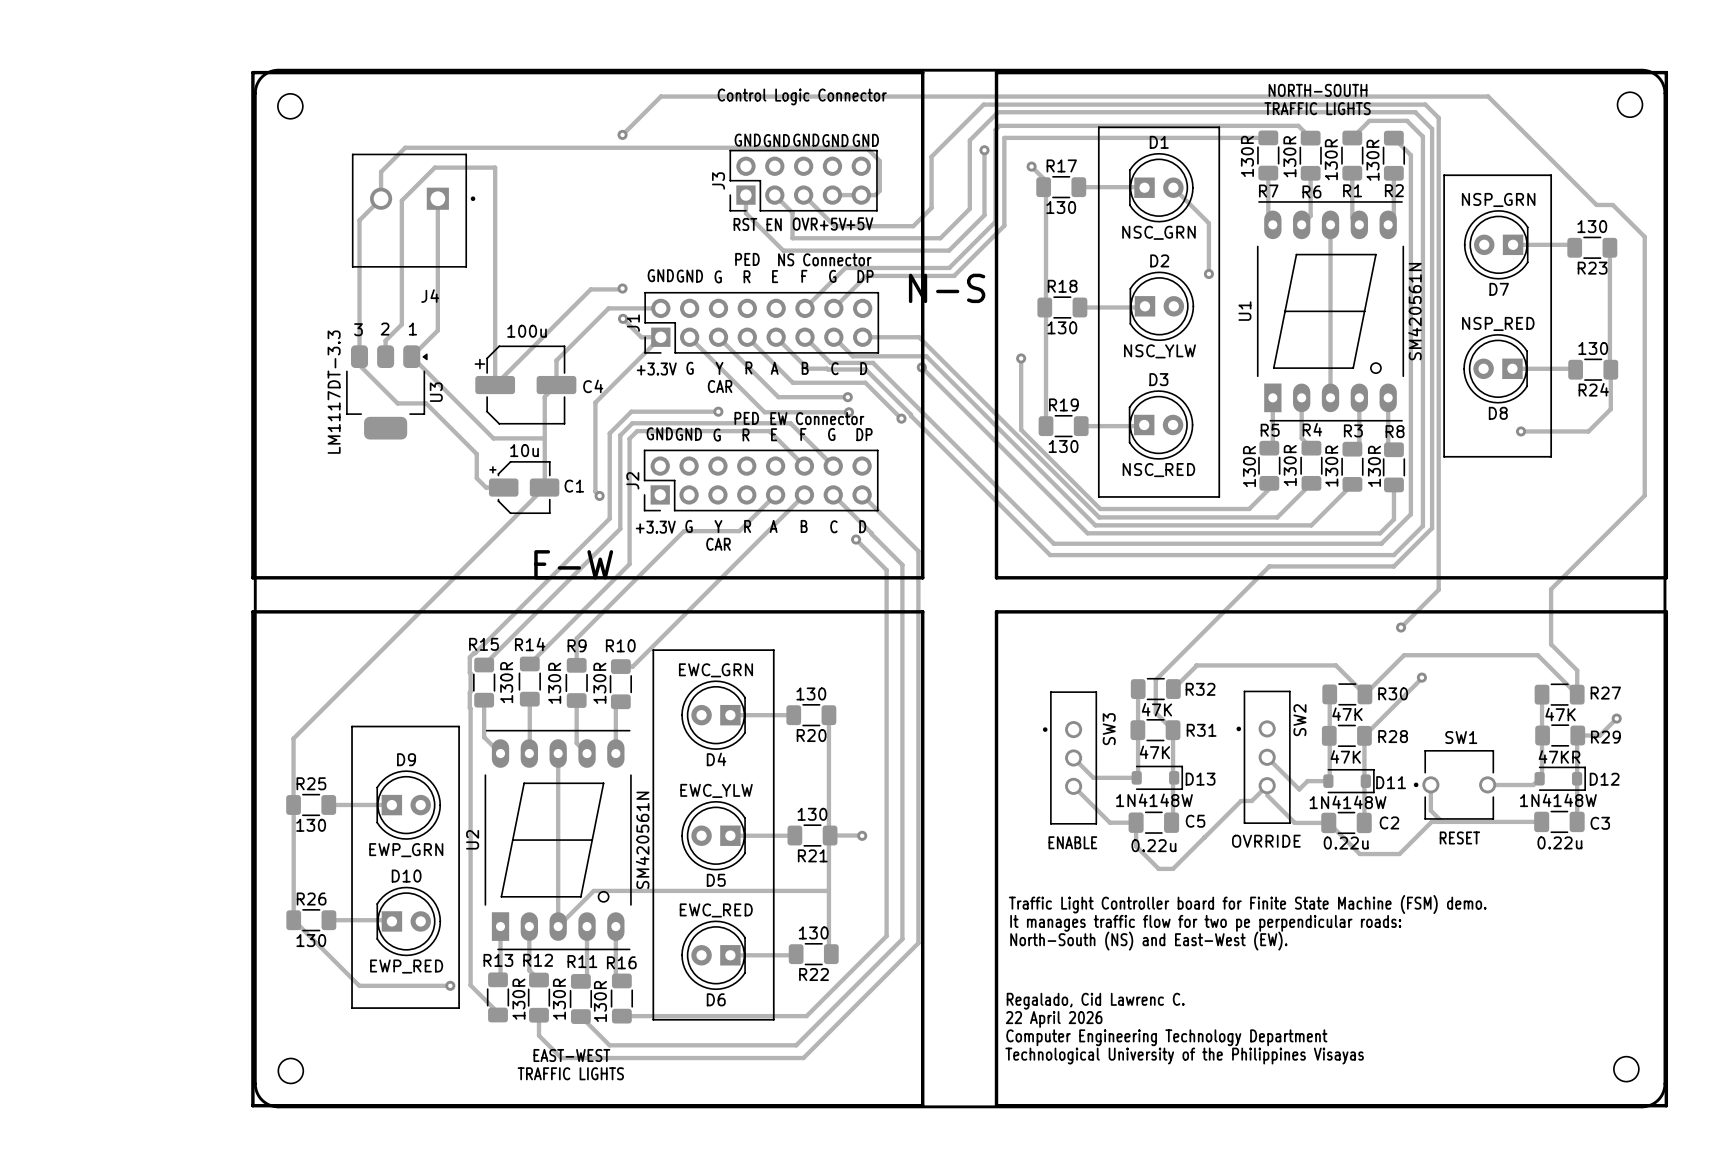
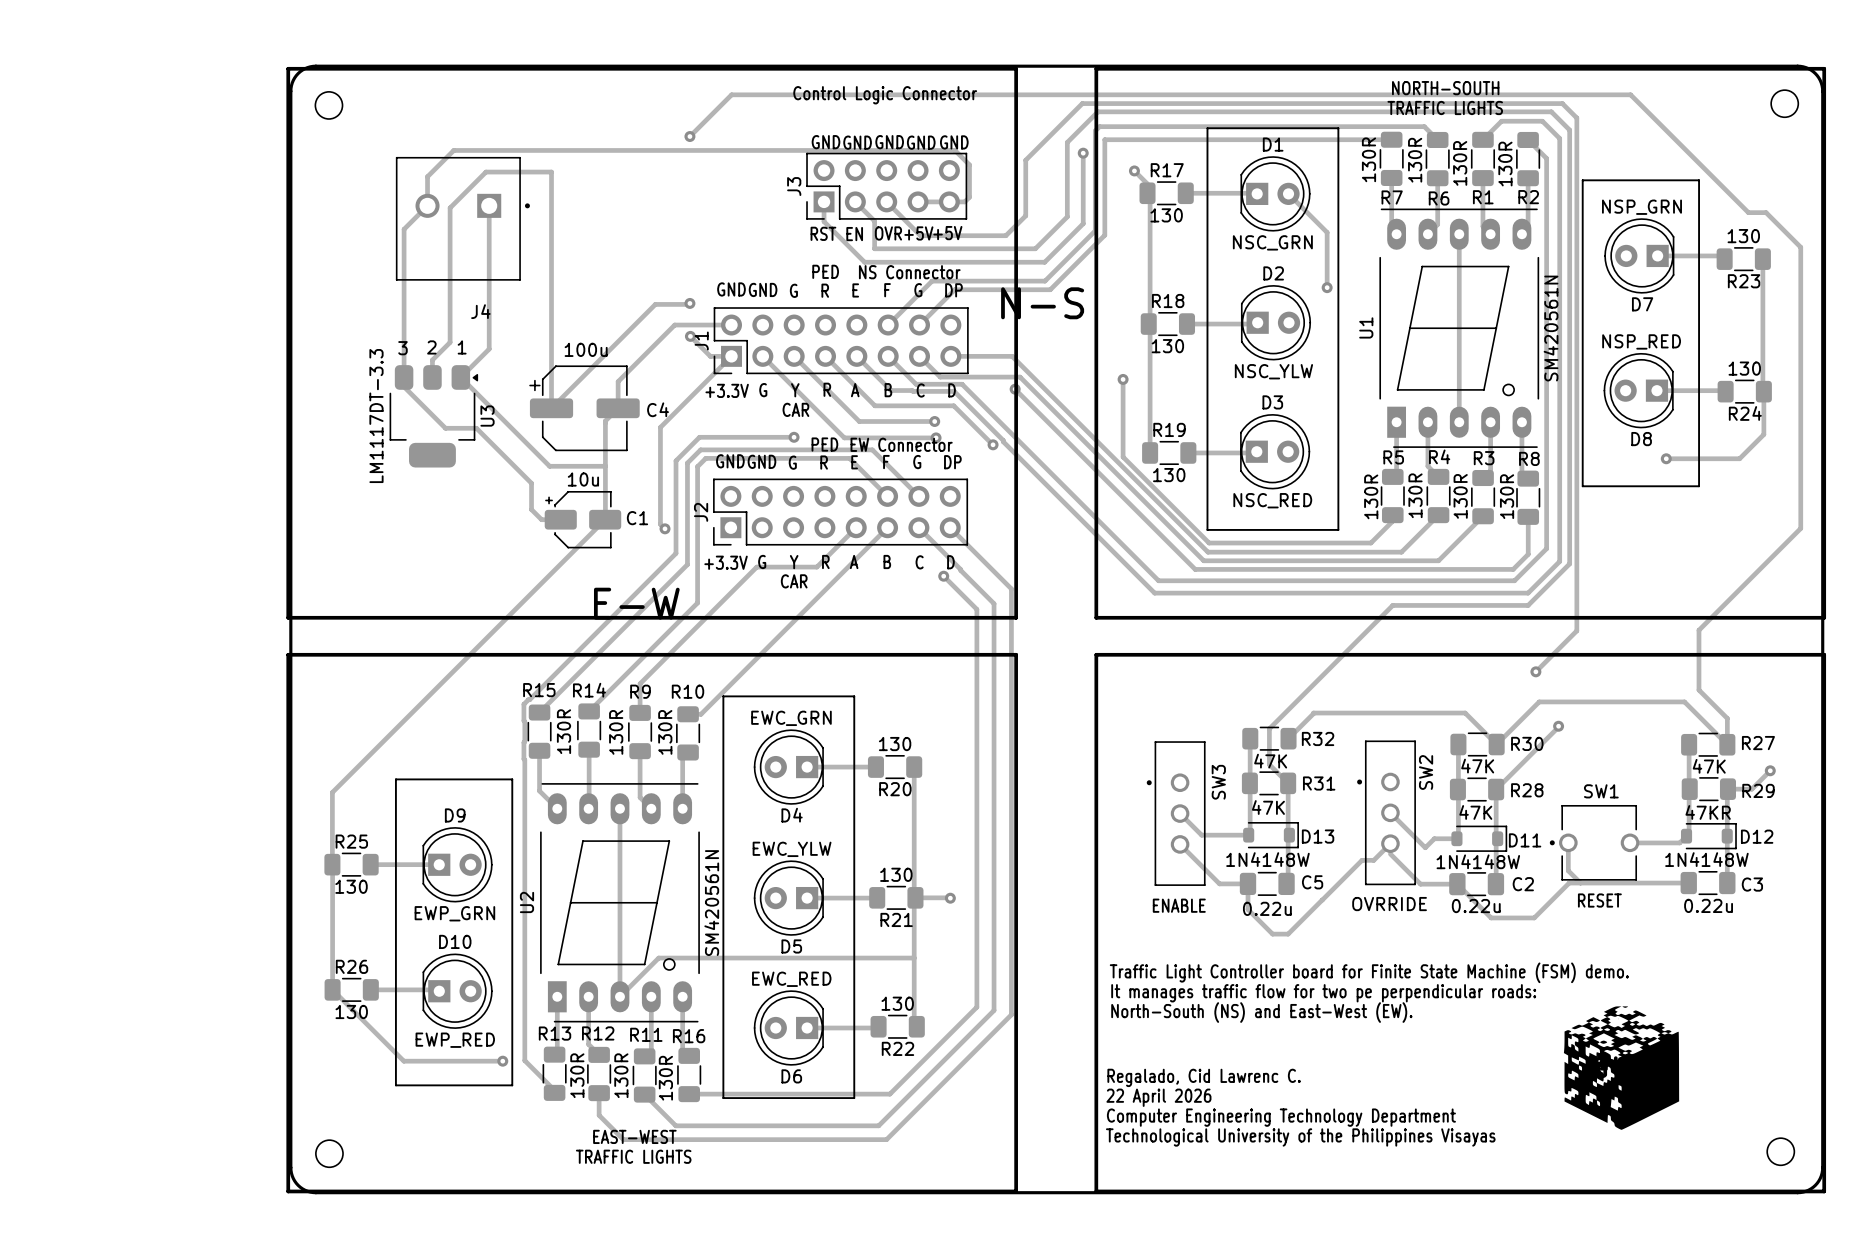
part: none -> (1621, 1068)

